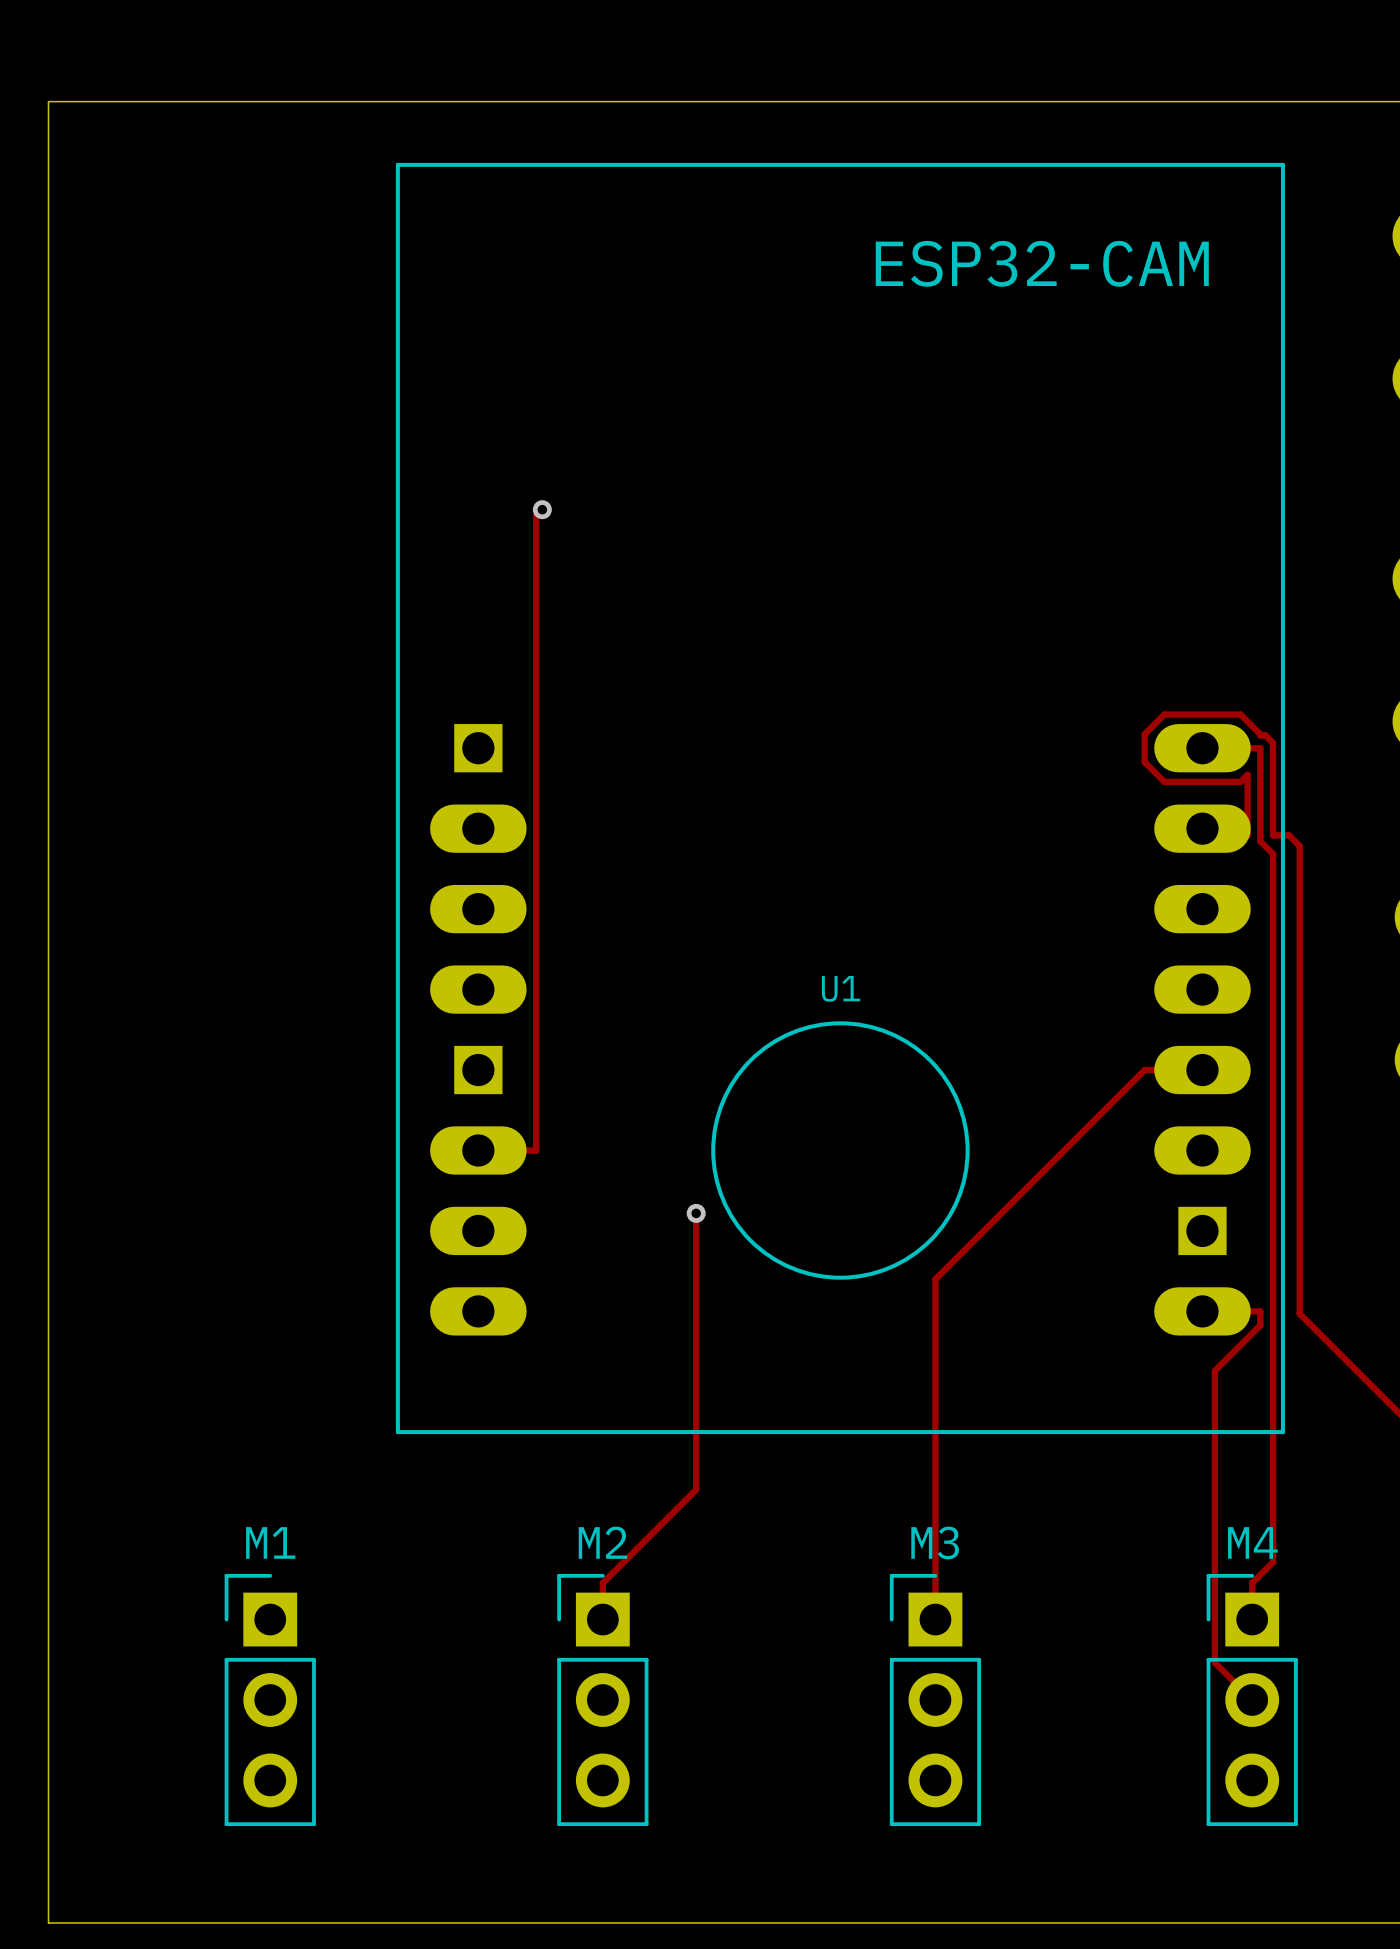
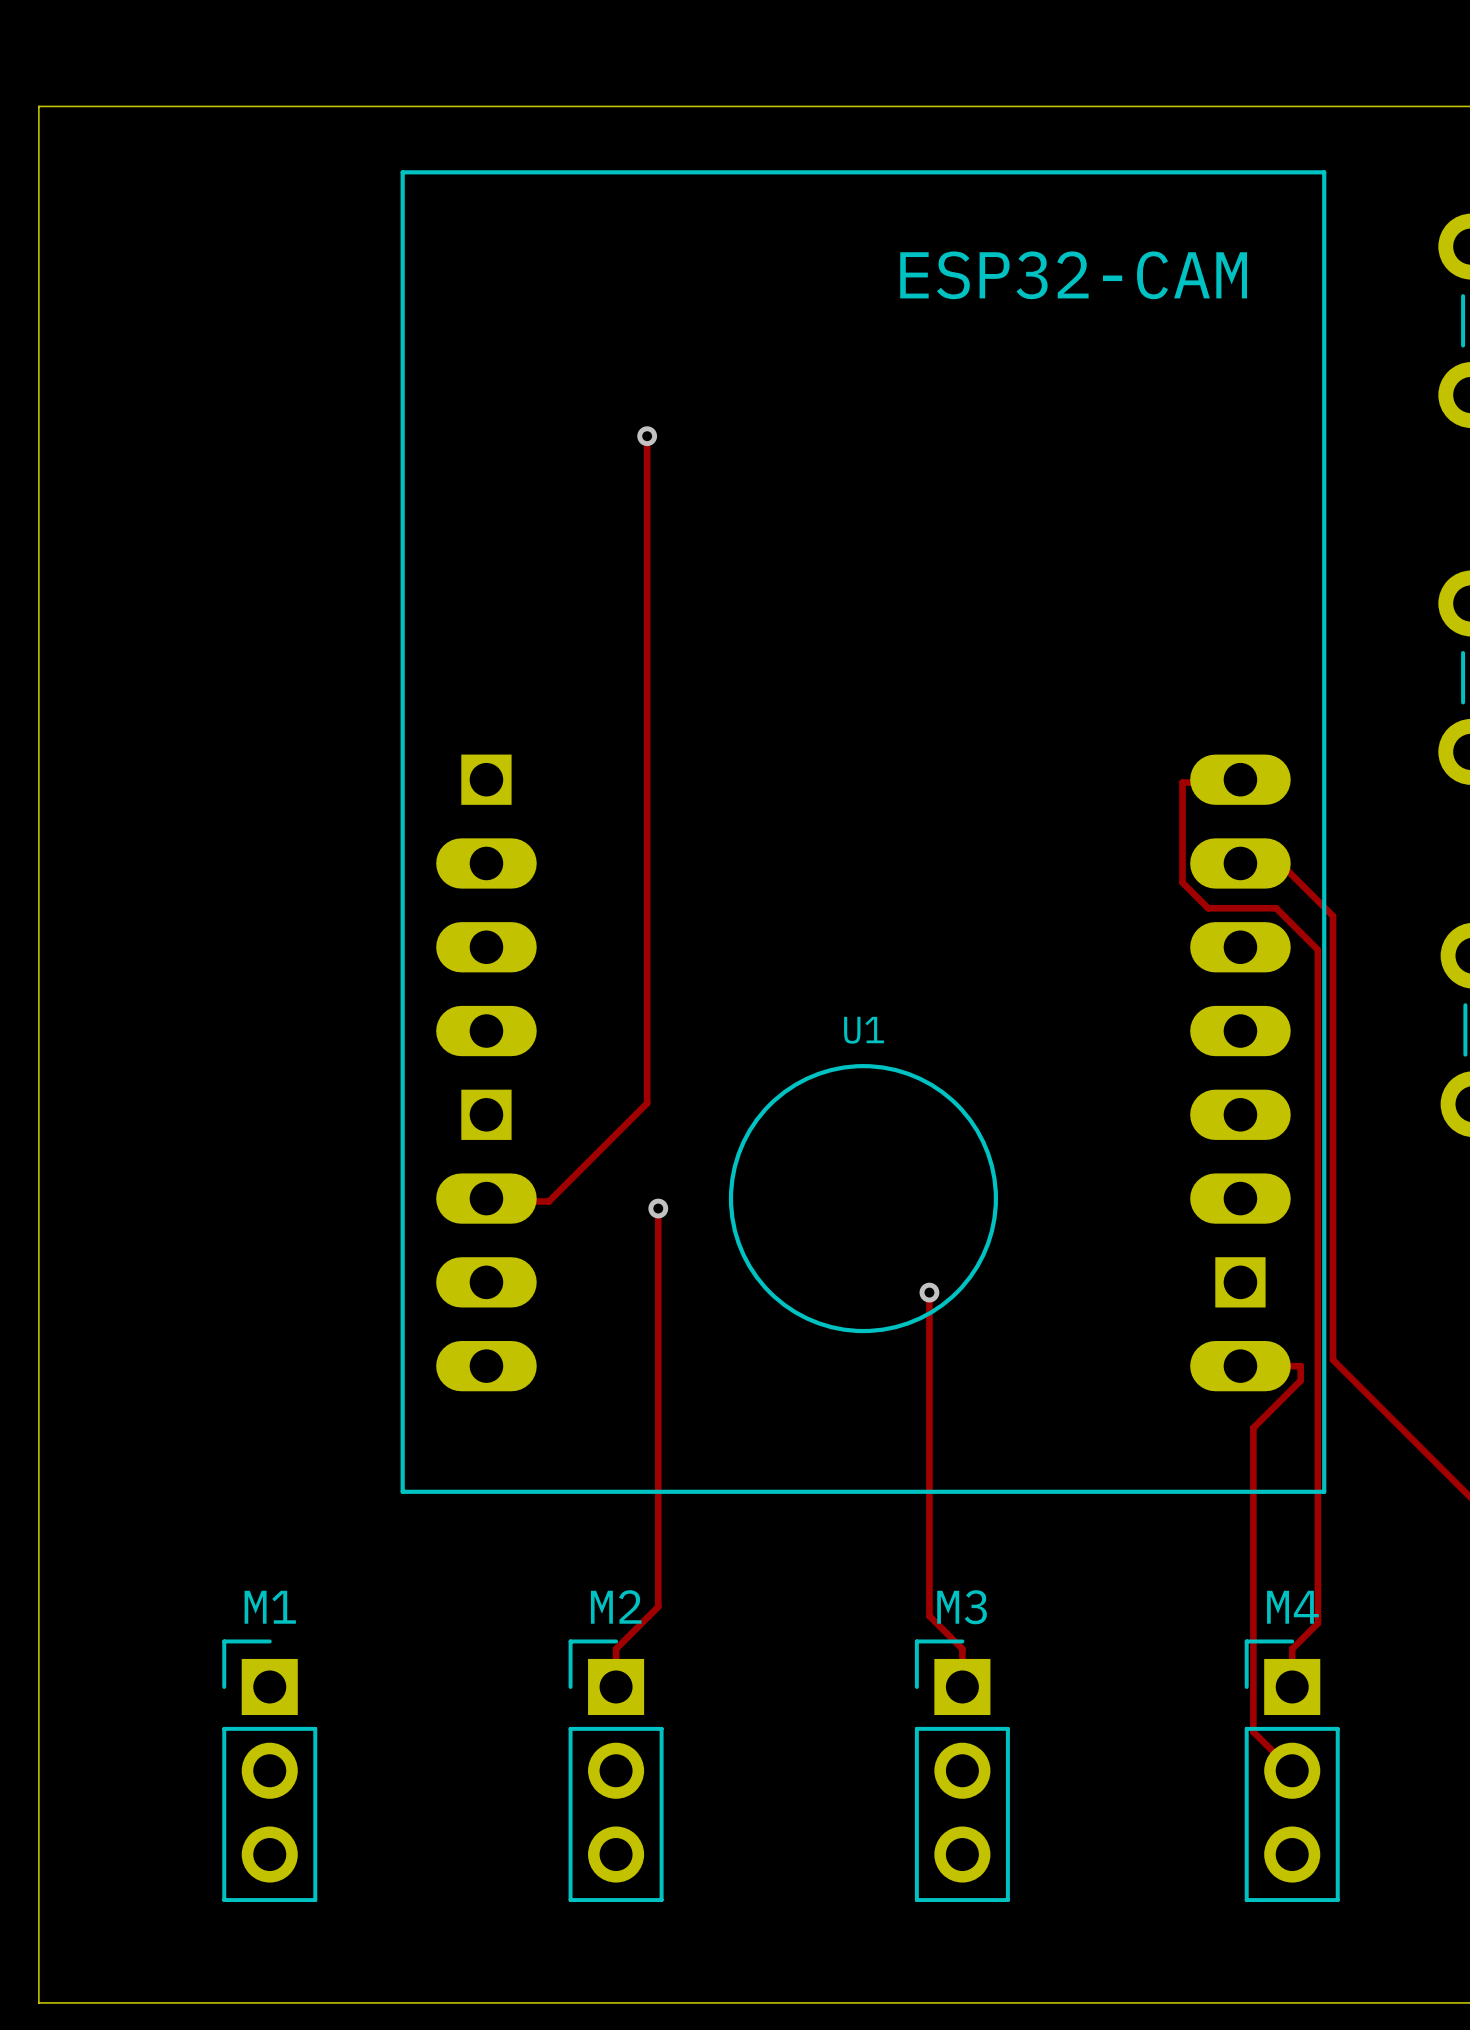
track: none -> (647, 436) (647, 1103) (548, 1201) (488, 1201)
track: (542, 509) (536, 515) (536, 1150) (478, 1150) -> none
via position: (542, 509) -> (647, 436)
track: (1202, 748) (1260, 748) (1260, 841) (1273, 853) (1273, 1562) -> (1242, 782) (1182, 782) (1182, 882) (1208, 908) (1276, 908) (1317, 949) (1317, 1623) (1313, 1627)
track: (1247, 835) (1247, 774) (1240, 781) (1164, 781) (1144, 762) (1144, 734) (1164, 714) (1240, 714) (1260, 735) (1265, 735) (1273, 742) (1273, 835) (1289, 835) (1299, 846) (1299, 1313) -> (1287, 870) (1333, 916) (1333, 1359) (1341, 1368)
track: (1202, 1070) (1144, 1070) (935, 1279) (935, 1583) -> (929, 1292) (929, 1616) (962, 1648)
track: (696, 1212) (696, 1489) (643, 1542) -> (658, 1208) (658, 1606)
via position: (696, 1213) -> (658, 1208)
via: none -> (929, 1292)

